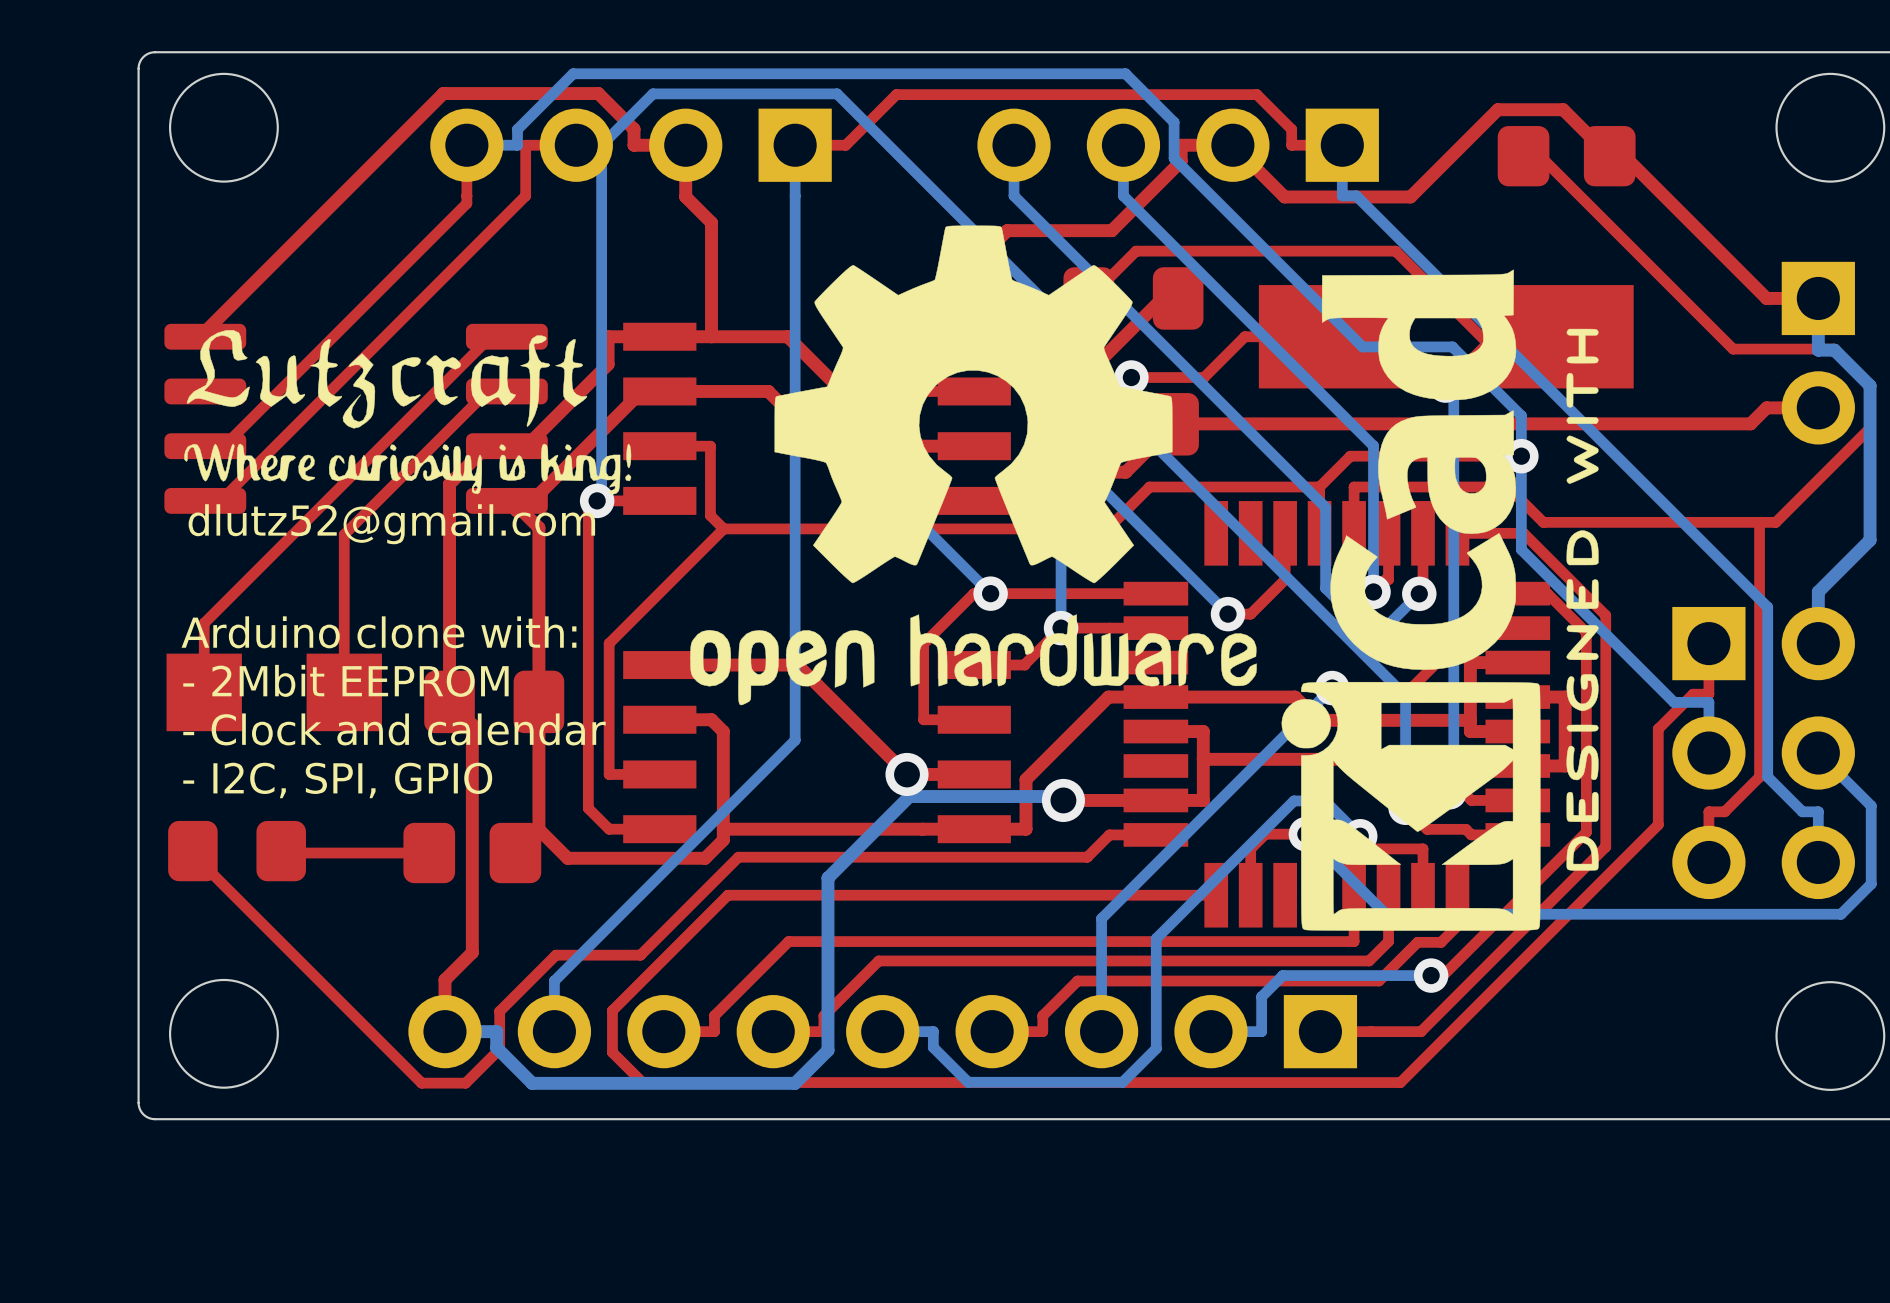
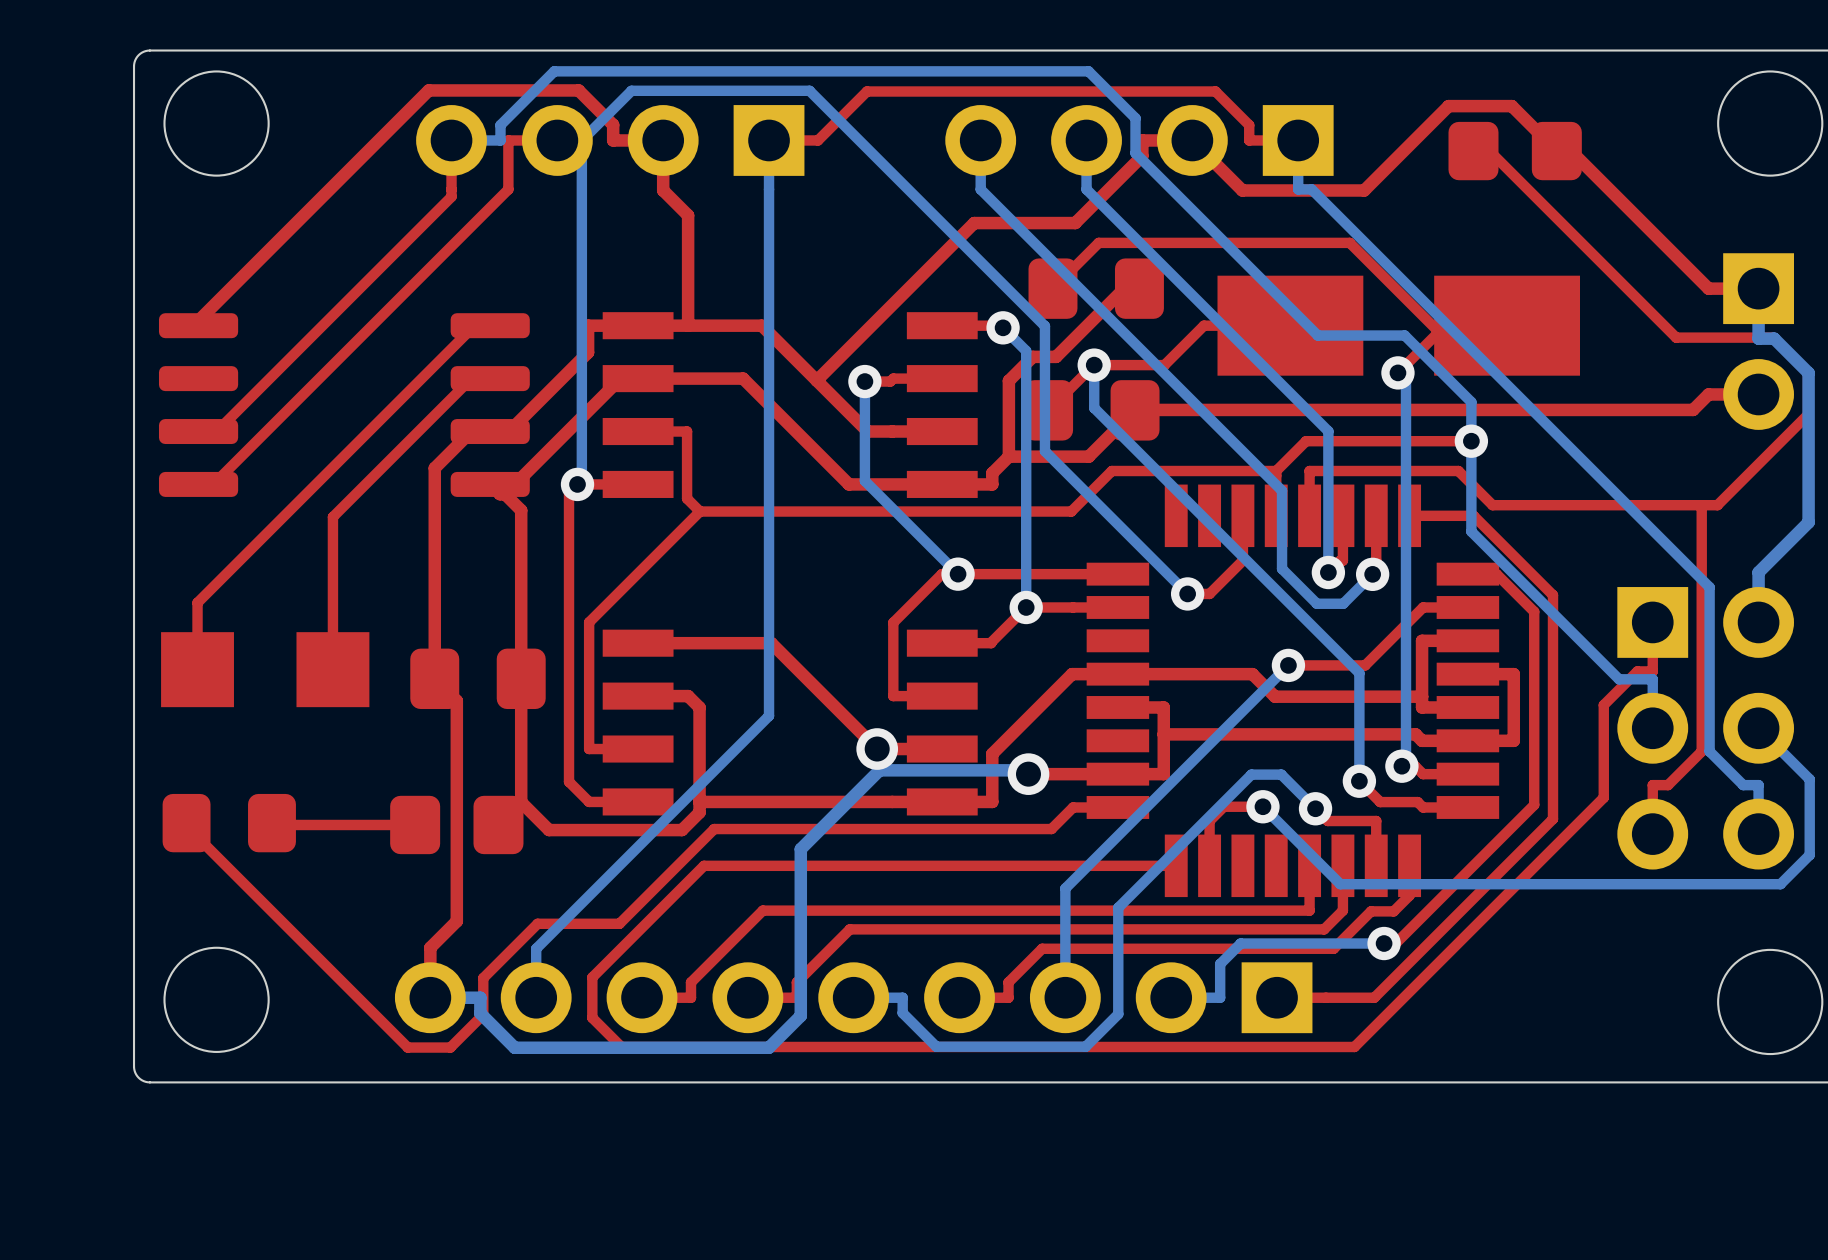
drawing: [690, 225, 1599, 931] -> none
drawing: [184, 330, 632, 495] -> none
text: dlutz52@gmail.com (391, 524) -> none
text: Arduino clone with: (379, 632) -> none
text: - 2Mbit EEPROM (345, 680) -> none
text: - Clock and calendar (394, 729) -> none
text: - I2C, SPI, GPIO (337, 780) -> none

